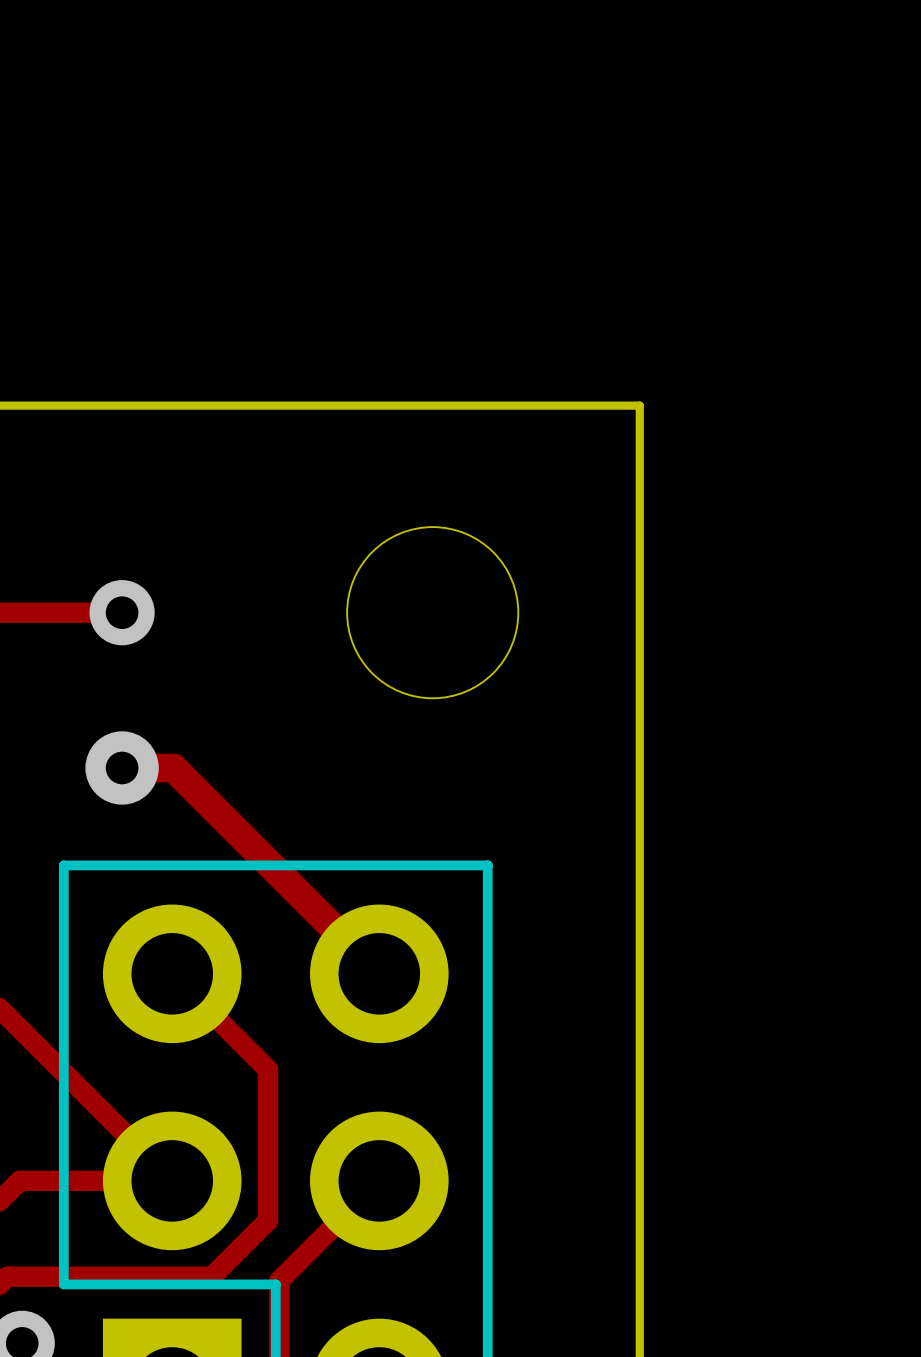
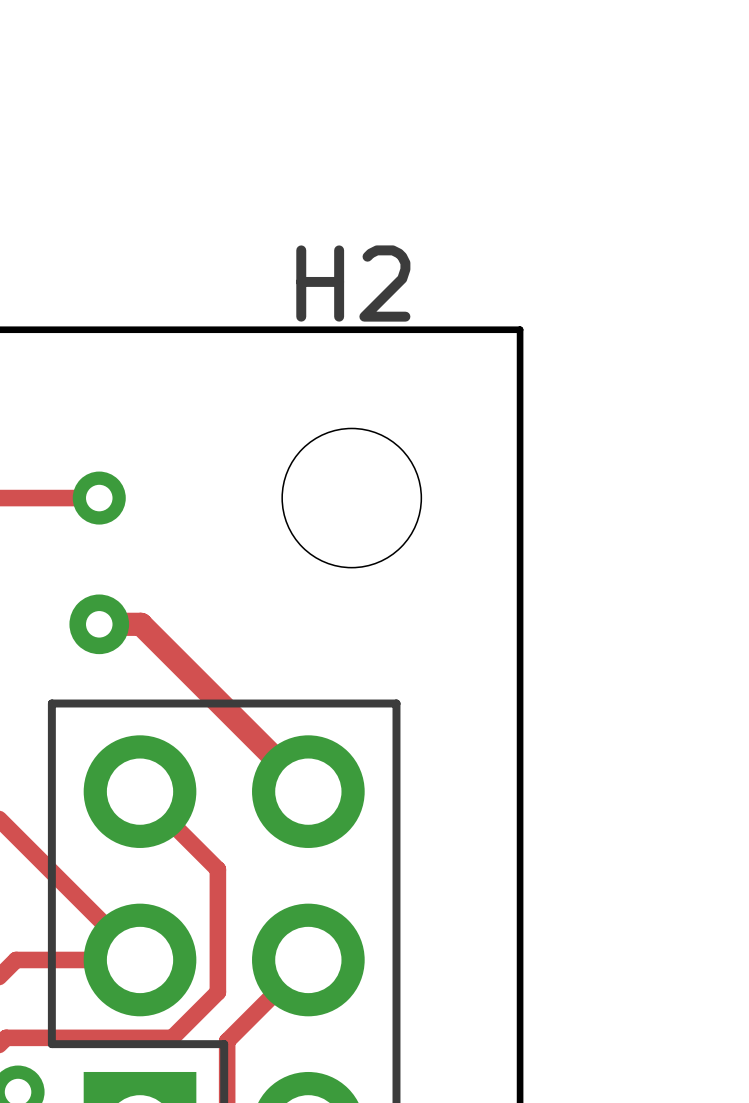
H2 name: none -> H2 (353, 283)

